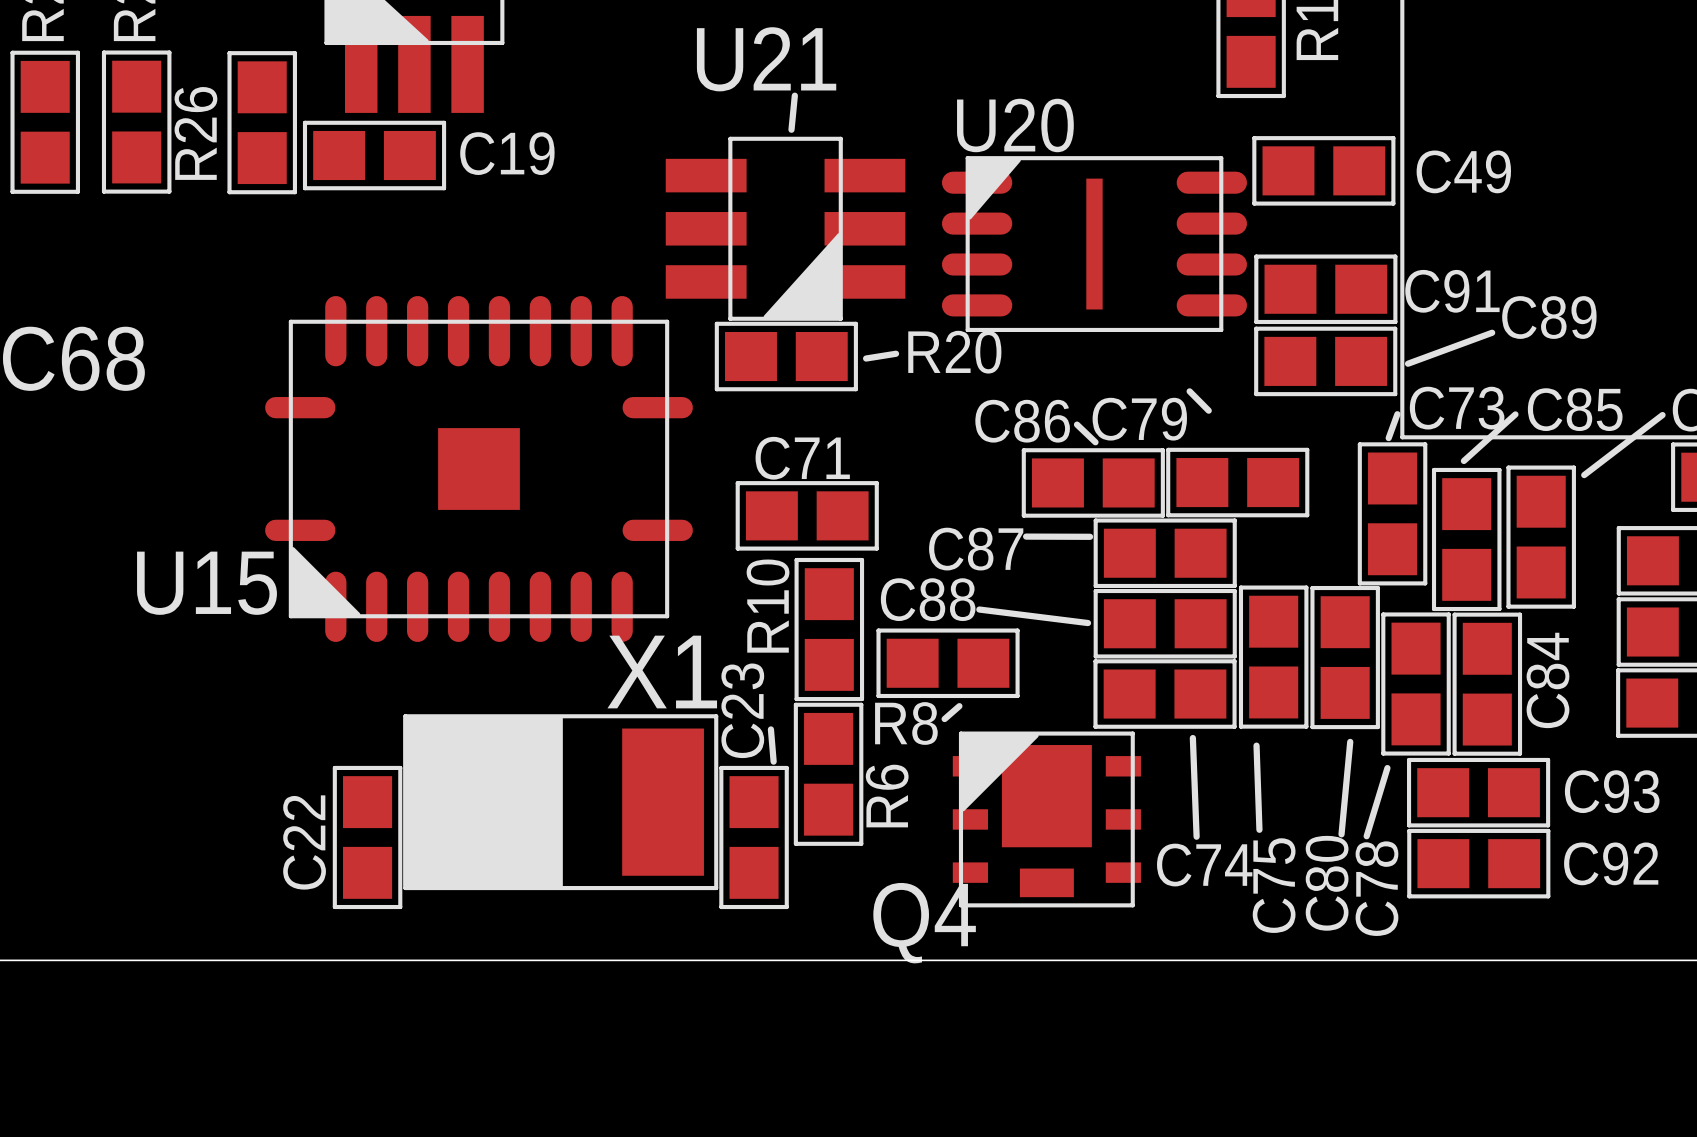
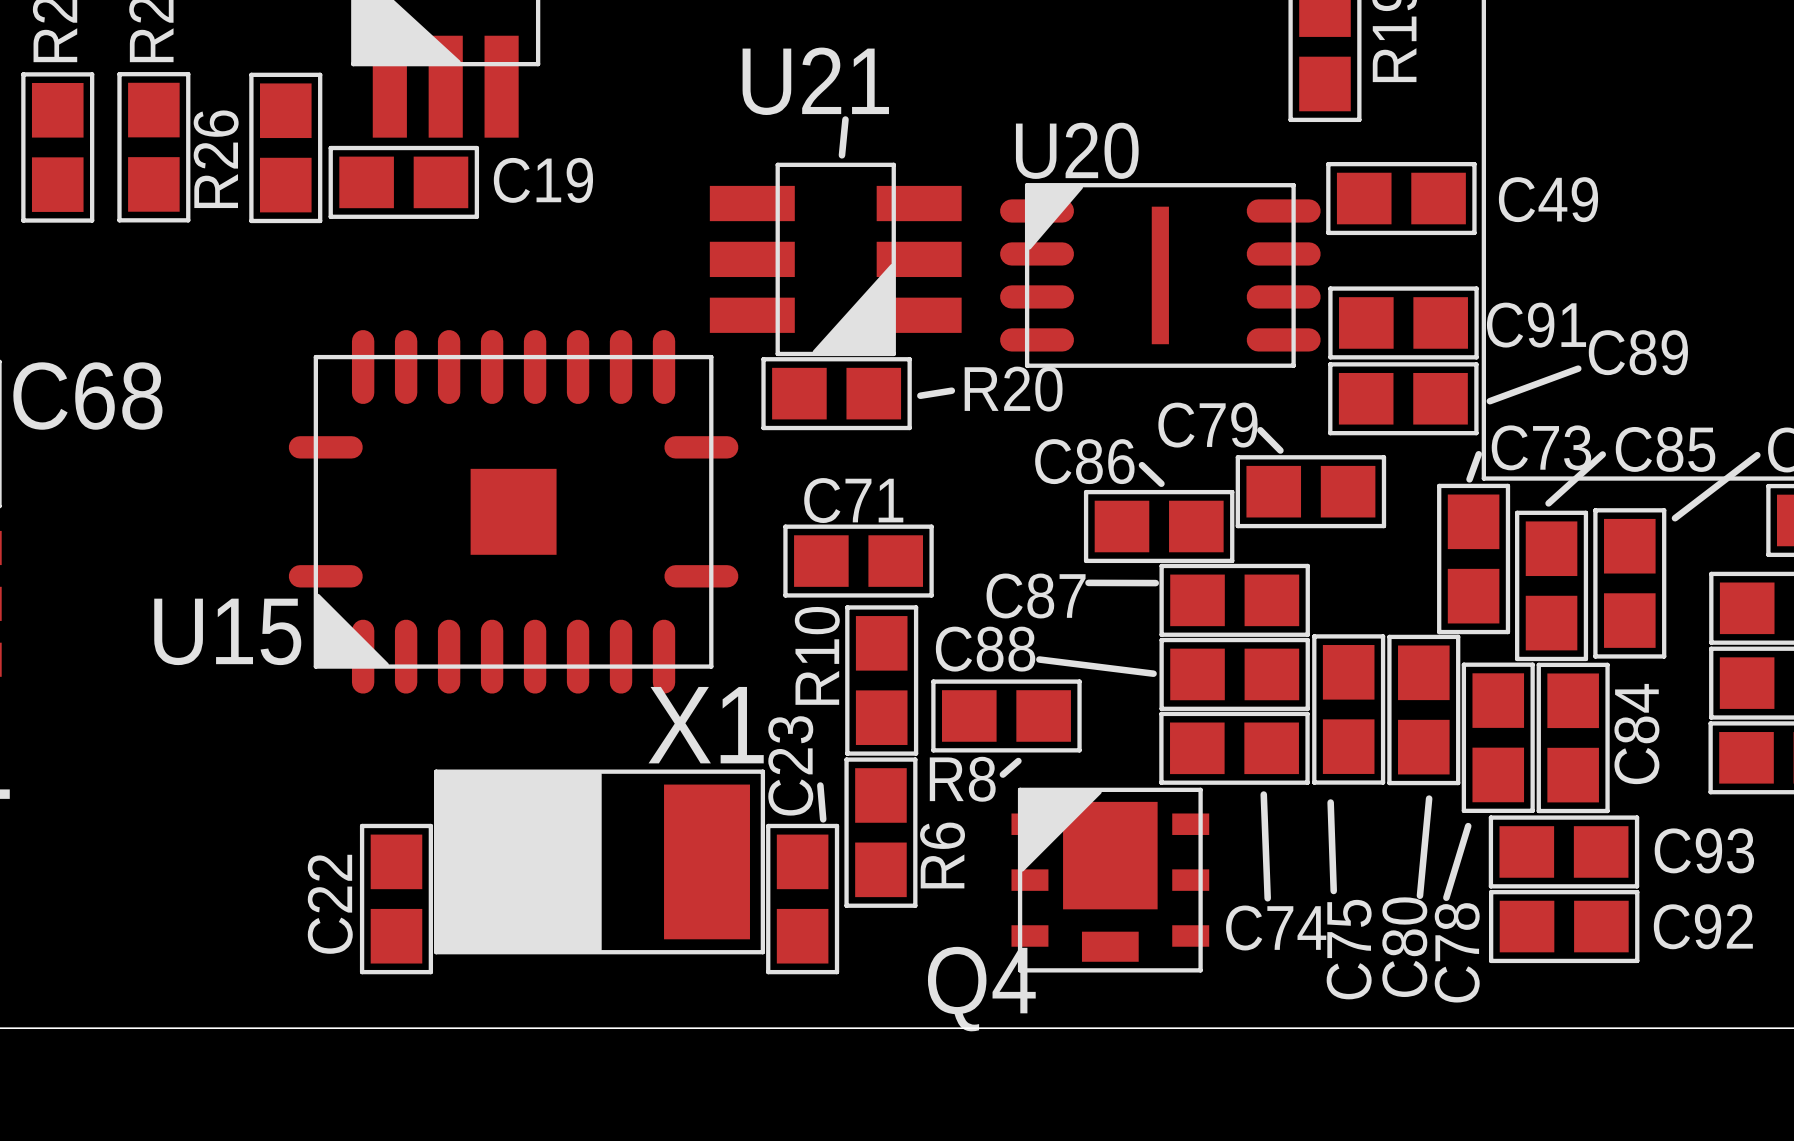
C79 position: (1237, 482) -> (1310, 491)

